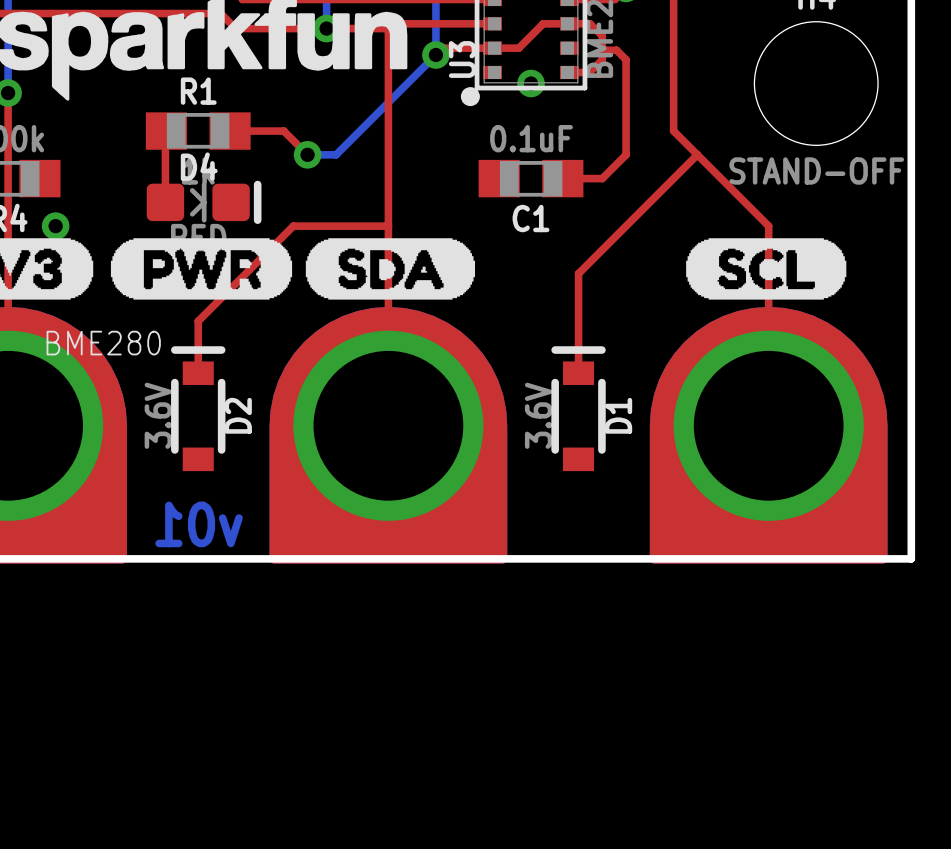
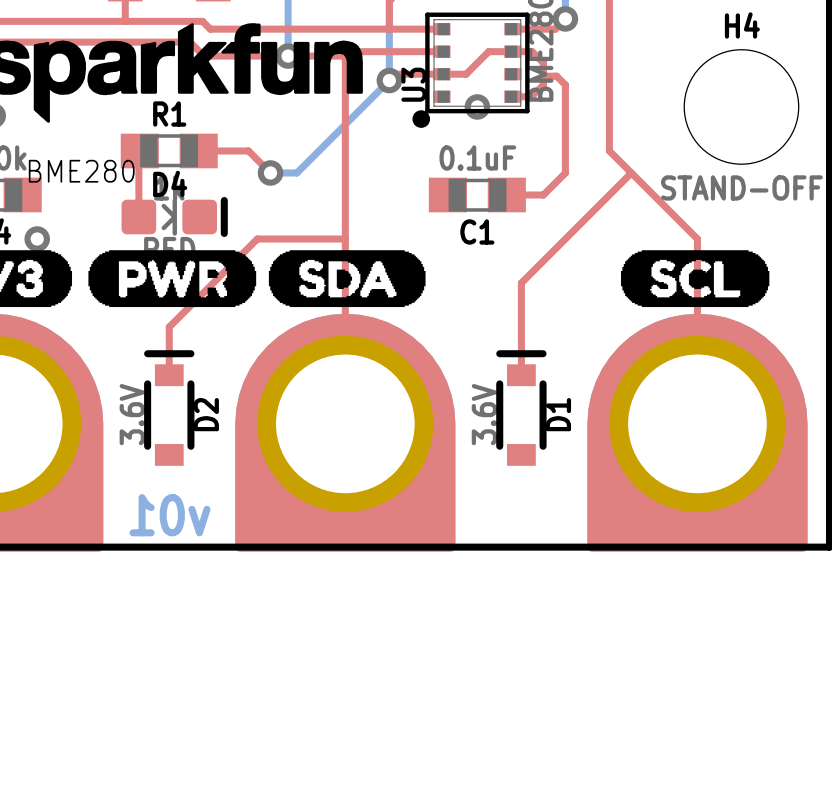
text position: BME280 (103, 343) -> BME280 (81, 171)

